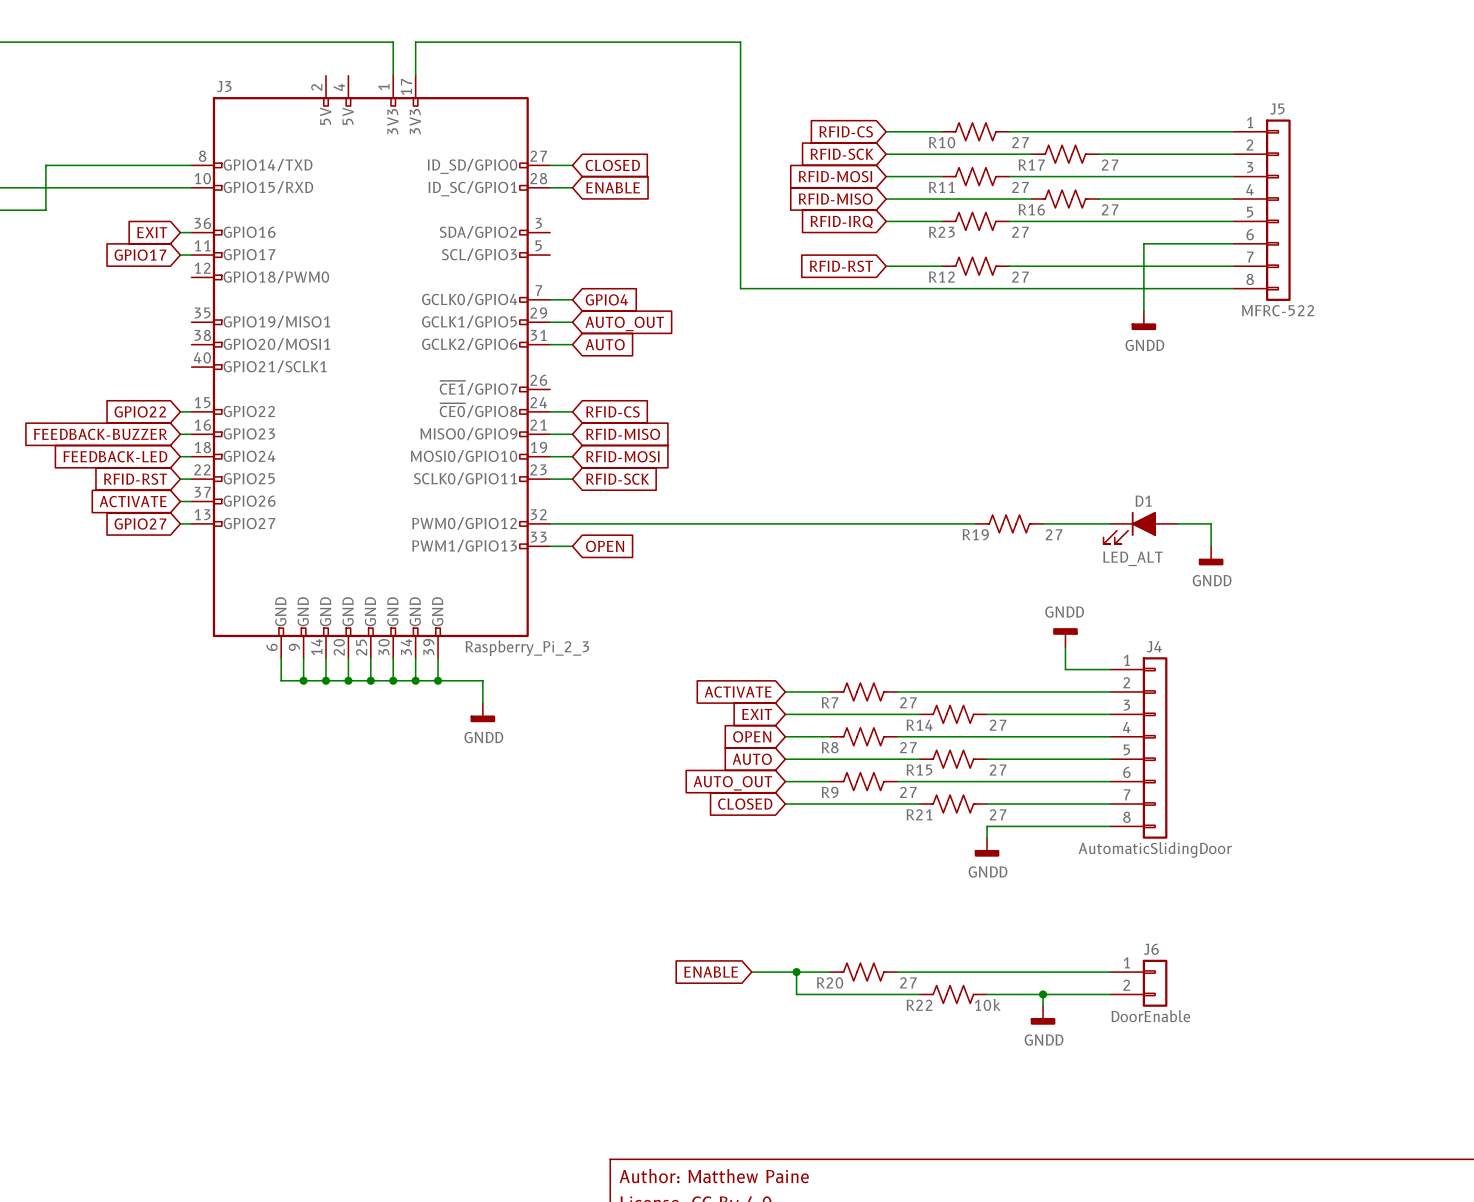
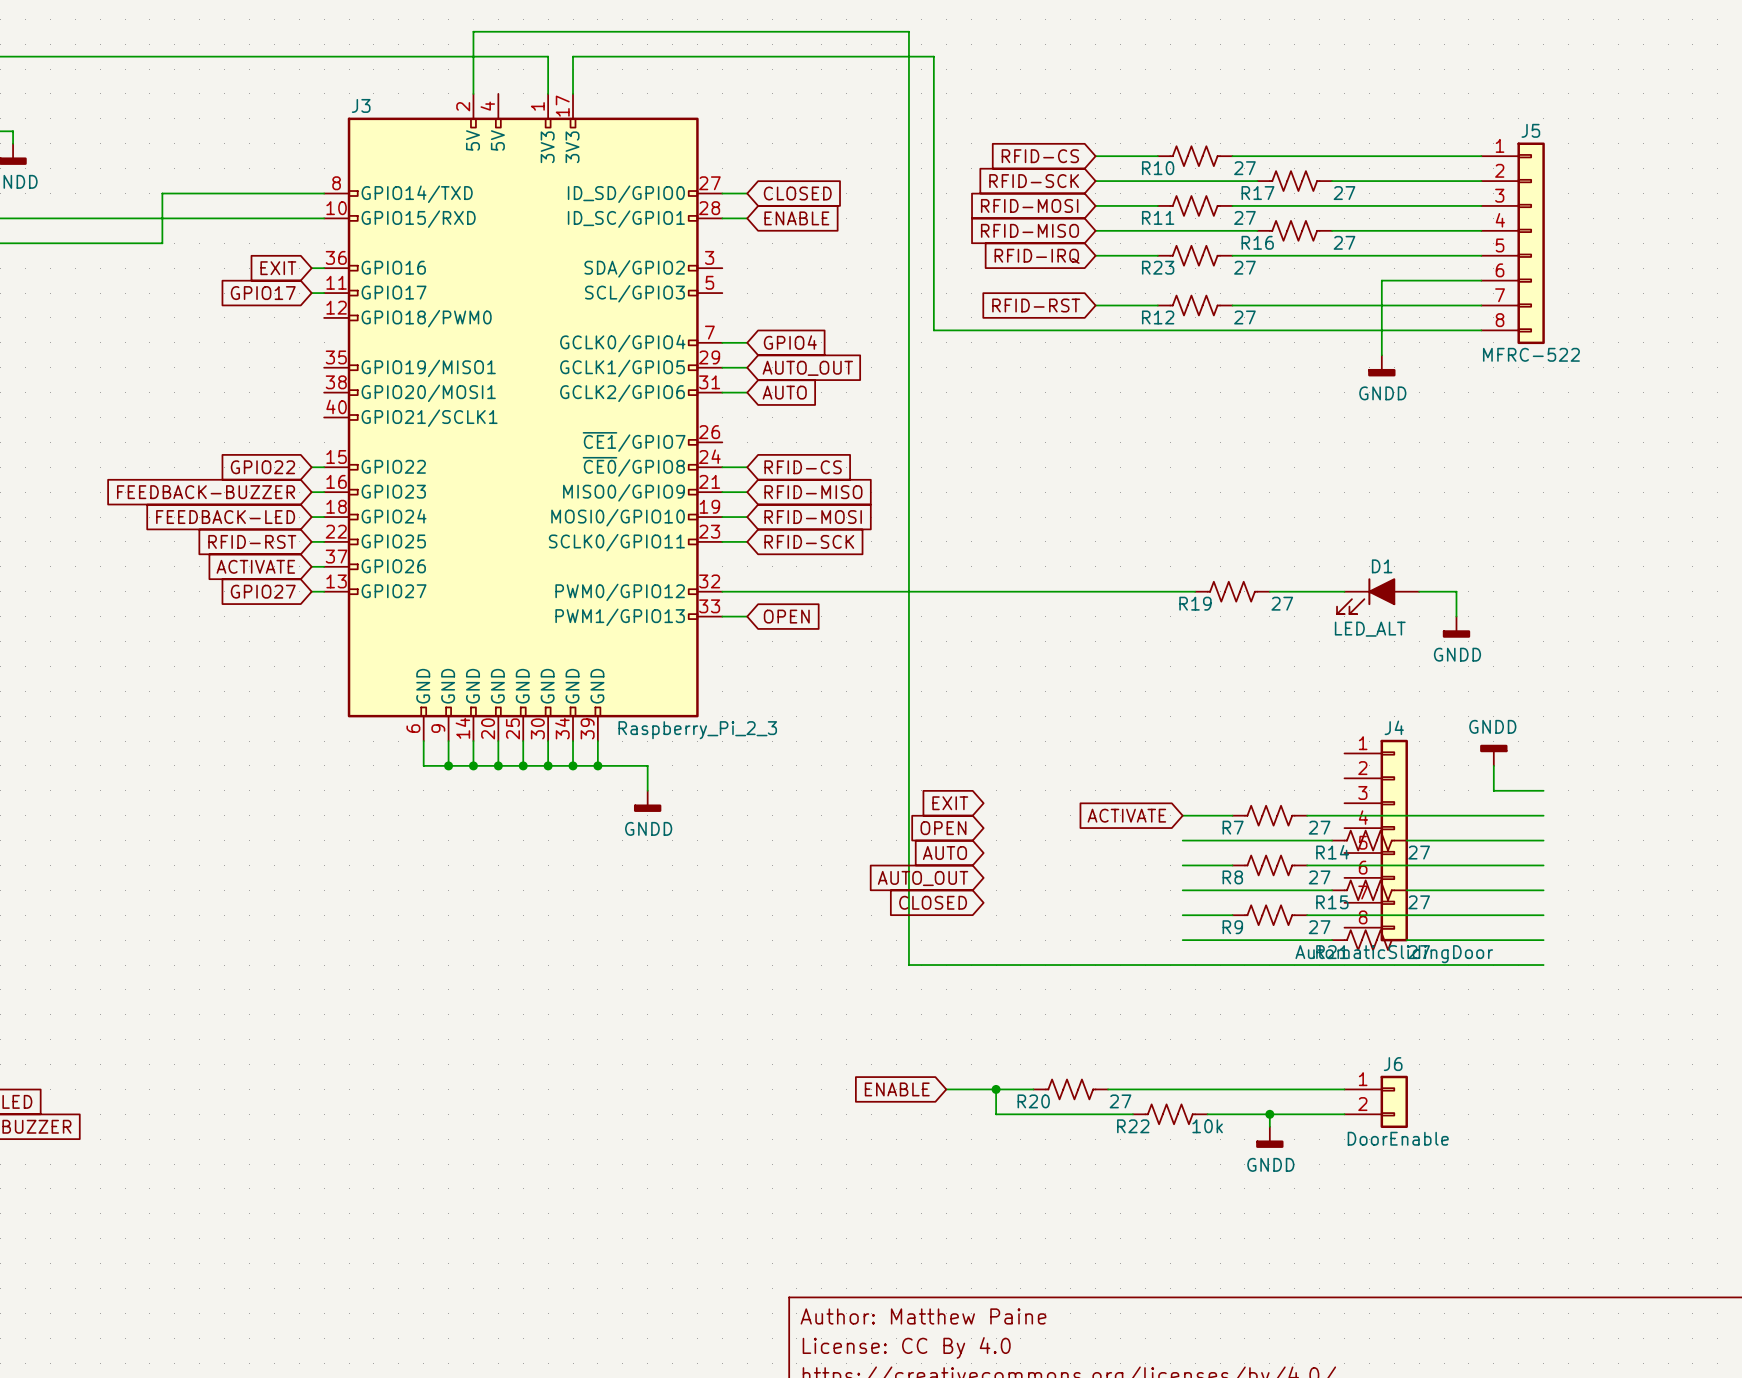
wire: none -> (473, 93) (473, 31) (908, 31) (908, 965) (1543, 965)
power symbol: GNDD (1065, 637) -> none
wire: (1065, 647) (1065, 669) (1110, 669) -> (1493, 765) (1493, 790) (1543, 790)
power symbol: none -> GNDD (1493, 755)
wire: (785, 691) (830, 691) -> (1182, 815) (1232, 815)
R7 position: (863, 691) -> (1269, 815)
wire: (897, 691) (1110, 691) -> (1307, 815) (1543, 815)
global label position: ACTIVATE (738, 692) -> ACTIVATE (1126, 815)
wire: (785, 714) (919, 714) -> (1182, 840) (1332, 840)
R14 position: (953, 714) -> (1369, 840)
wire: (987, 714) (1110, 714) -> (1406, 840) (1543, 840)
wire: (785, 736) (830, 736) -> (1182, 865) (1232, 865)
R8 position: (863, 736) -> (1269, 865)
wire: (897, 736) (1110, 736) -> (1307, 865) (1543, 865)
wire: (785, 759) (919, 759) -> (1182, 890) (1332, 890)
R15 position: (953, 759) -> (1369, 890)
wire: (987, 759) (1110, 759) -> (1406, 890) (1543, 890)
wire: (785, 781) (830, 781) -> (1182, 915) (1232, 915)
R9 position: (863, 781) -> (1269, 915)
wire: (897, 781) (1110, 781) -> (1307, 915) (1543, 915)
wire: (785, 804) (919, 804) -> (1182, 940) (1332, 940)
R21 position: (953, 804) -> (1369, 940)
wire: (987, 804) (1110, 804) -> (1406, 940) (1543, 940)
wire: (1110, 826) (987, 826) (987, 837) -> none
power symbol: GNDD (987, 847) -> none

